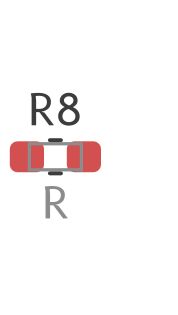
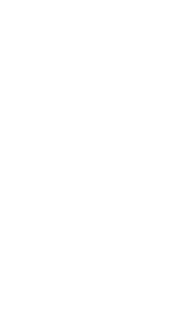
R8: R (55, 156) -> none

